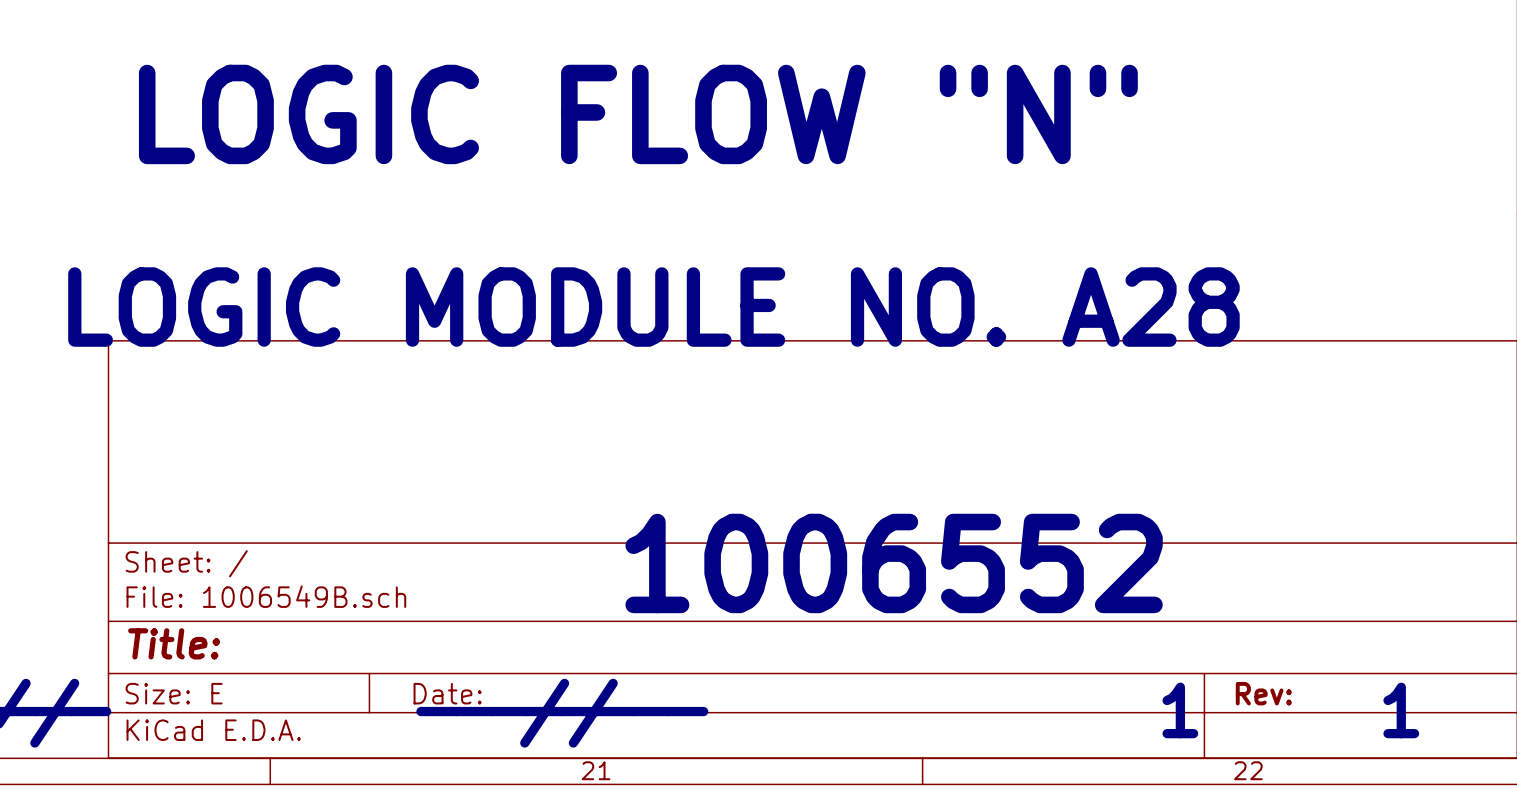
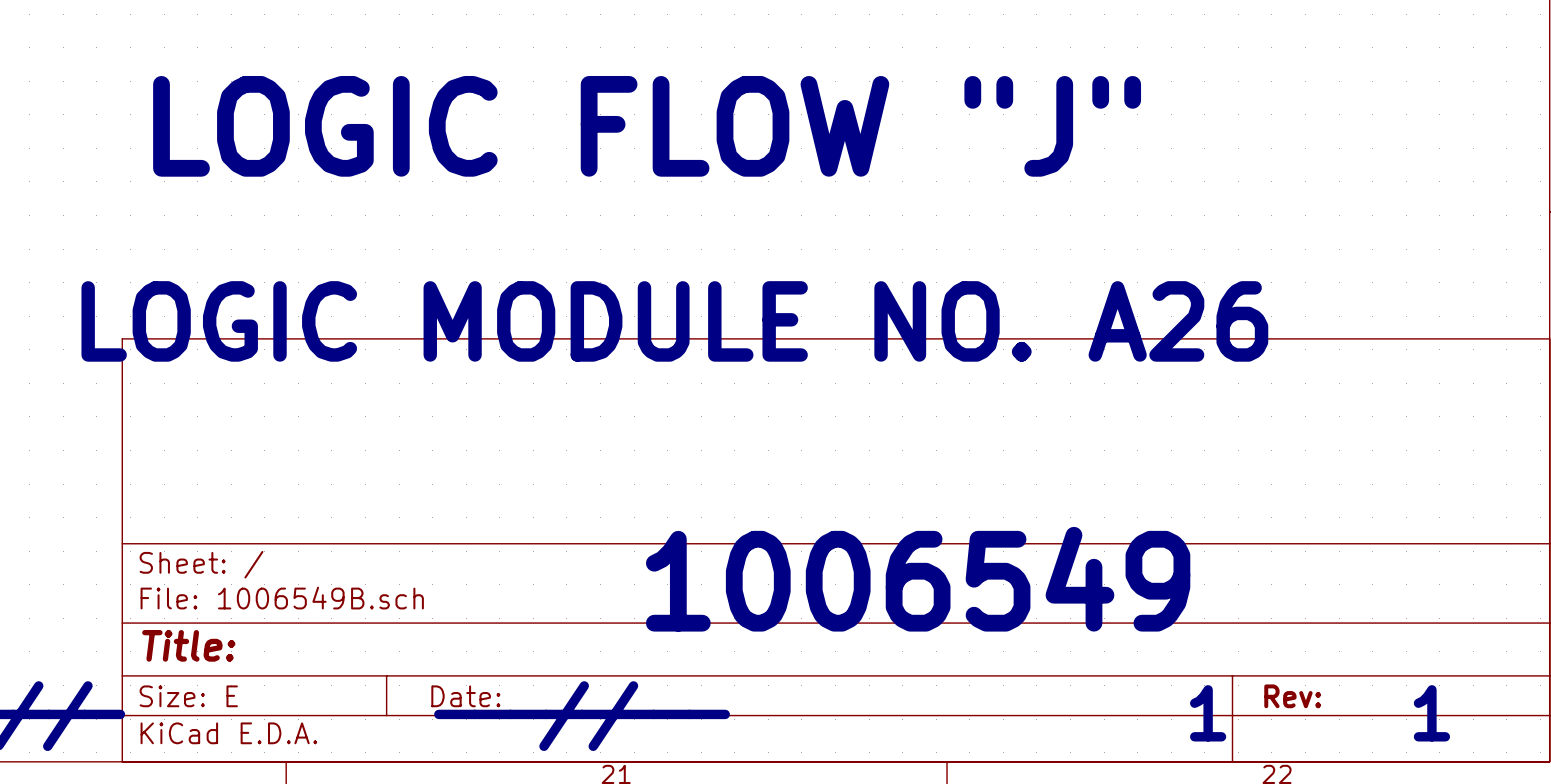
text: LOGIC FLOW "N" (638, 114) -> LOGIC FLOW "J" (647, 126)
text: LOGIC MODULE NO. A28 (653, 307) -> LOGIC MODULE NO. A26 (674, 321)
text: 1006552 (894, 563) -> 1006549 (918, 579)

